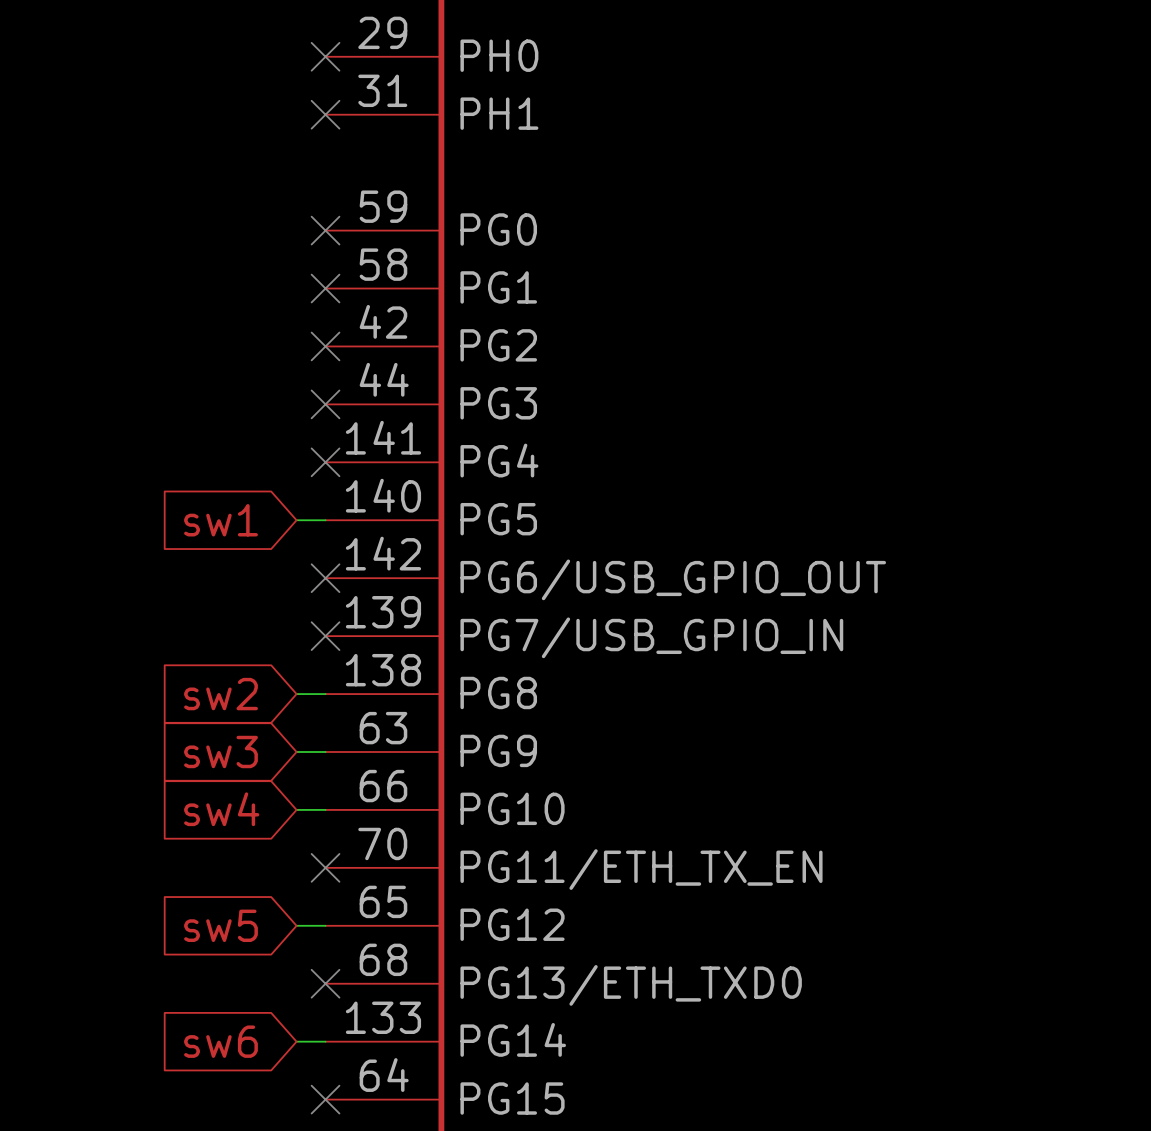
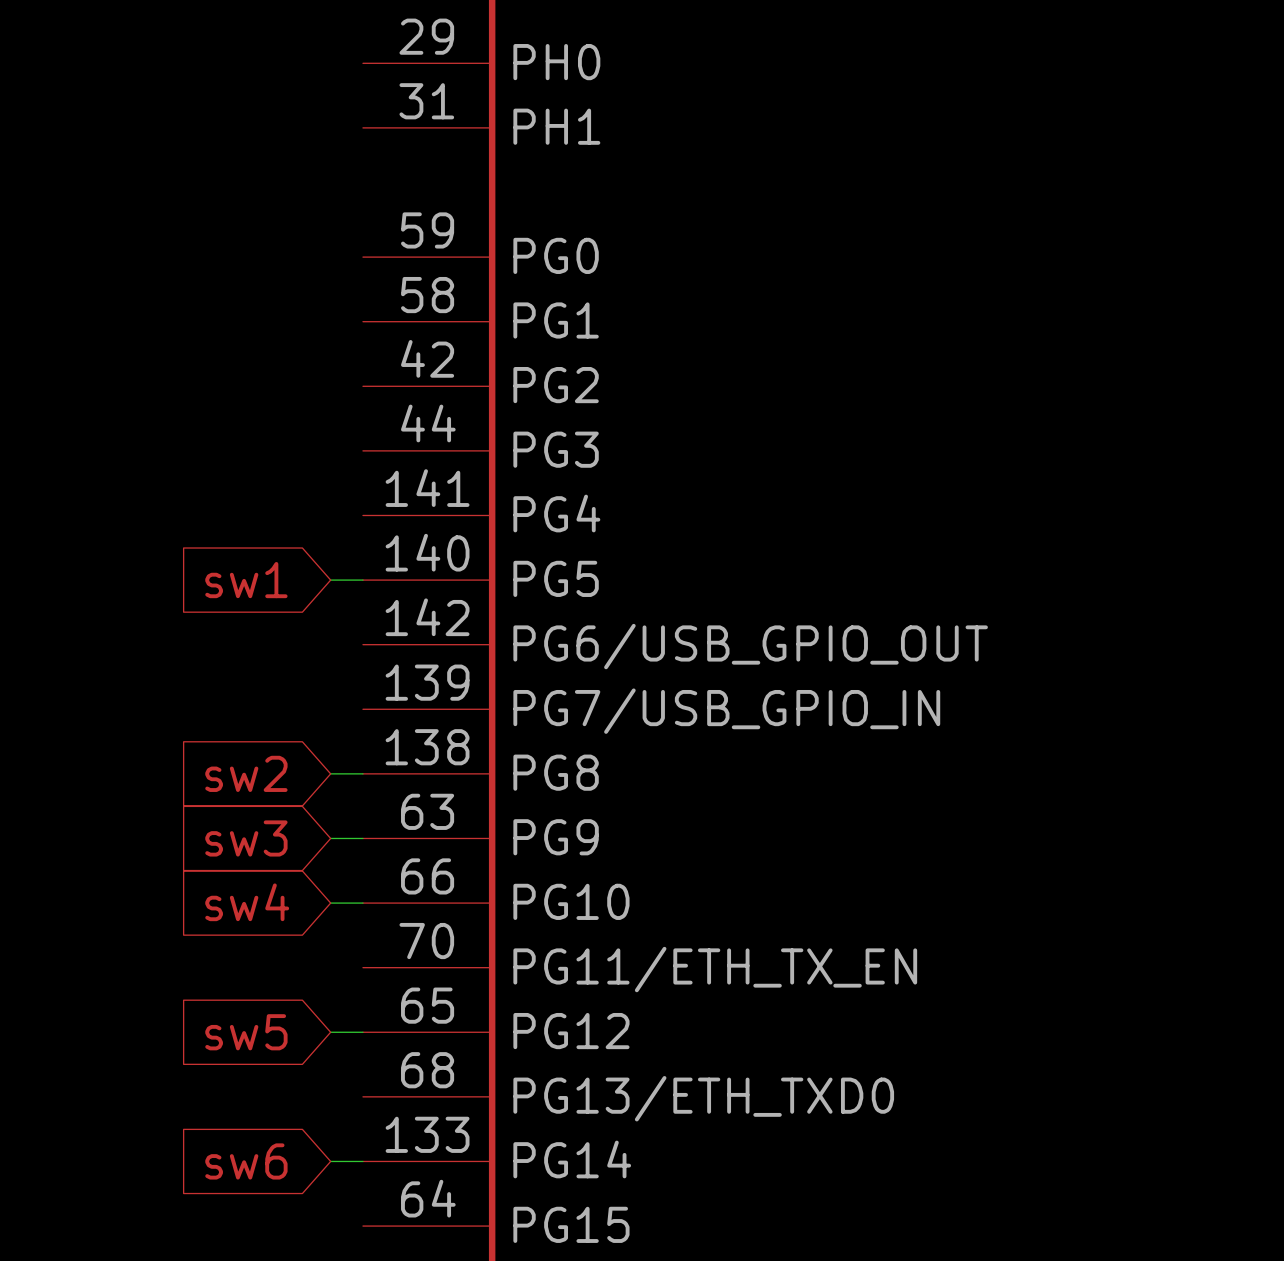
no-connect mark: (325, 56) -> none
no-connect mark: (325, 114) -> none
no-connect mark: (325, 230) -> none
no-connect mark: (325, 288) -> none
no-connect mark: (325, 346) -> none
no-connect mark: (325, 404) -> none
no-connect mark: (325, 462) -> none
no-connect mark: (325, 578) -> none
no-connect mark: (325, 636) -> none
no-connect mark: (325, 867) -> none
no-connect mark: (325, 983) -> none
no-connect mark: (325, 1099) -> none

